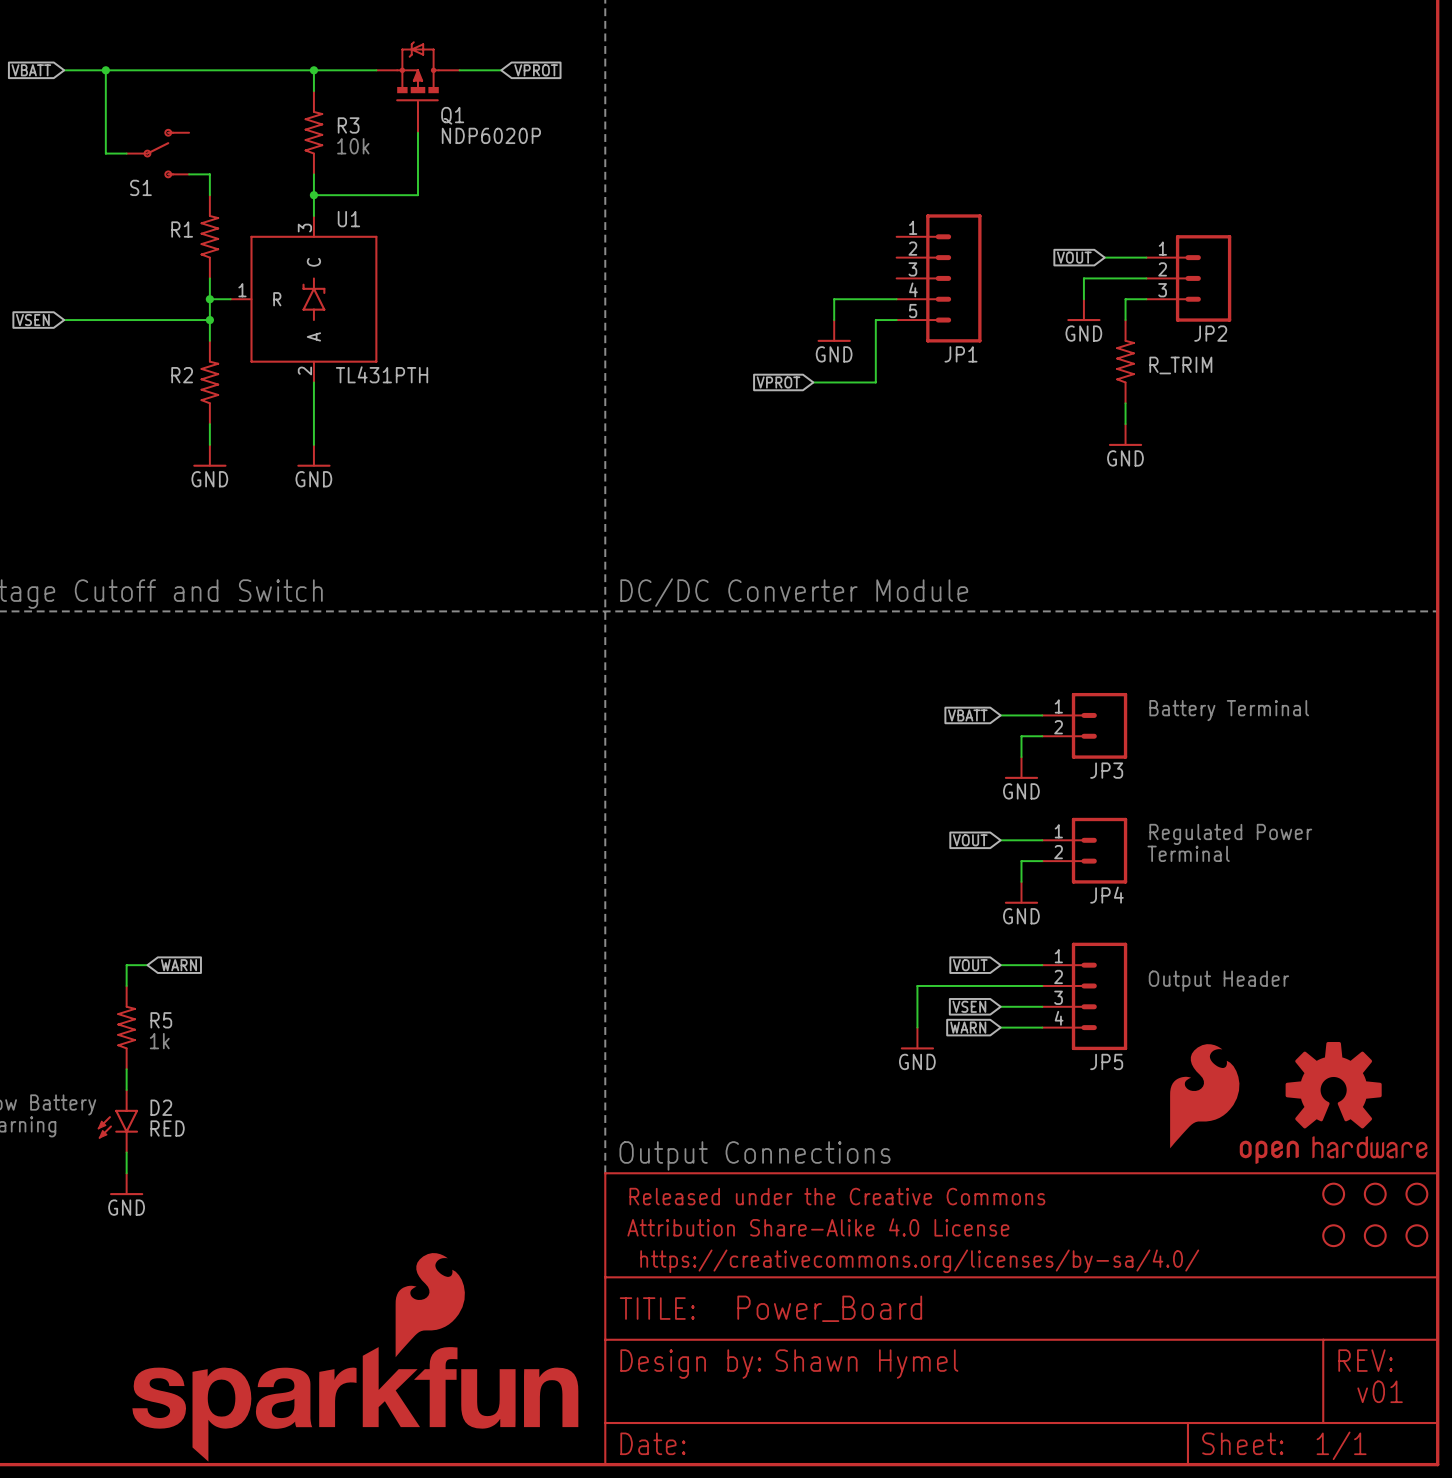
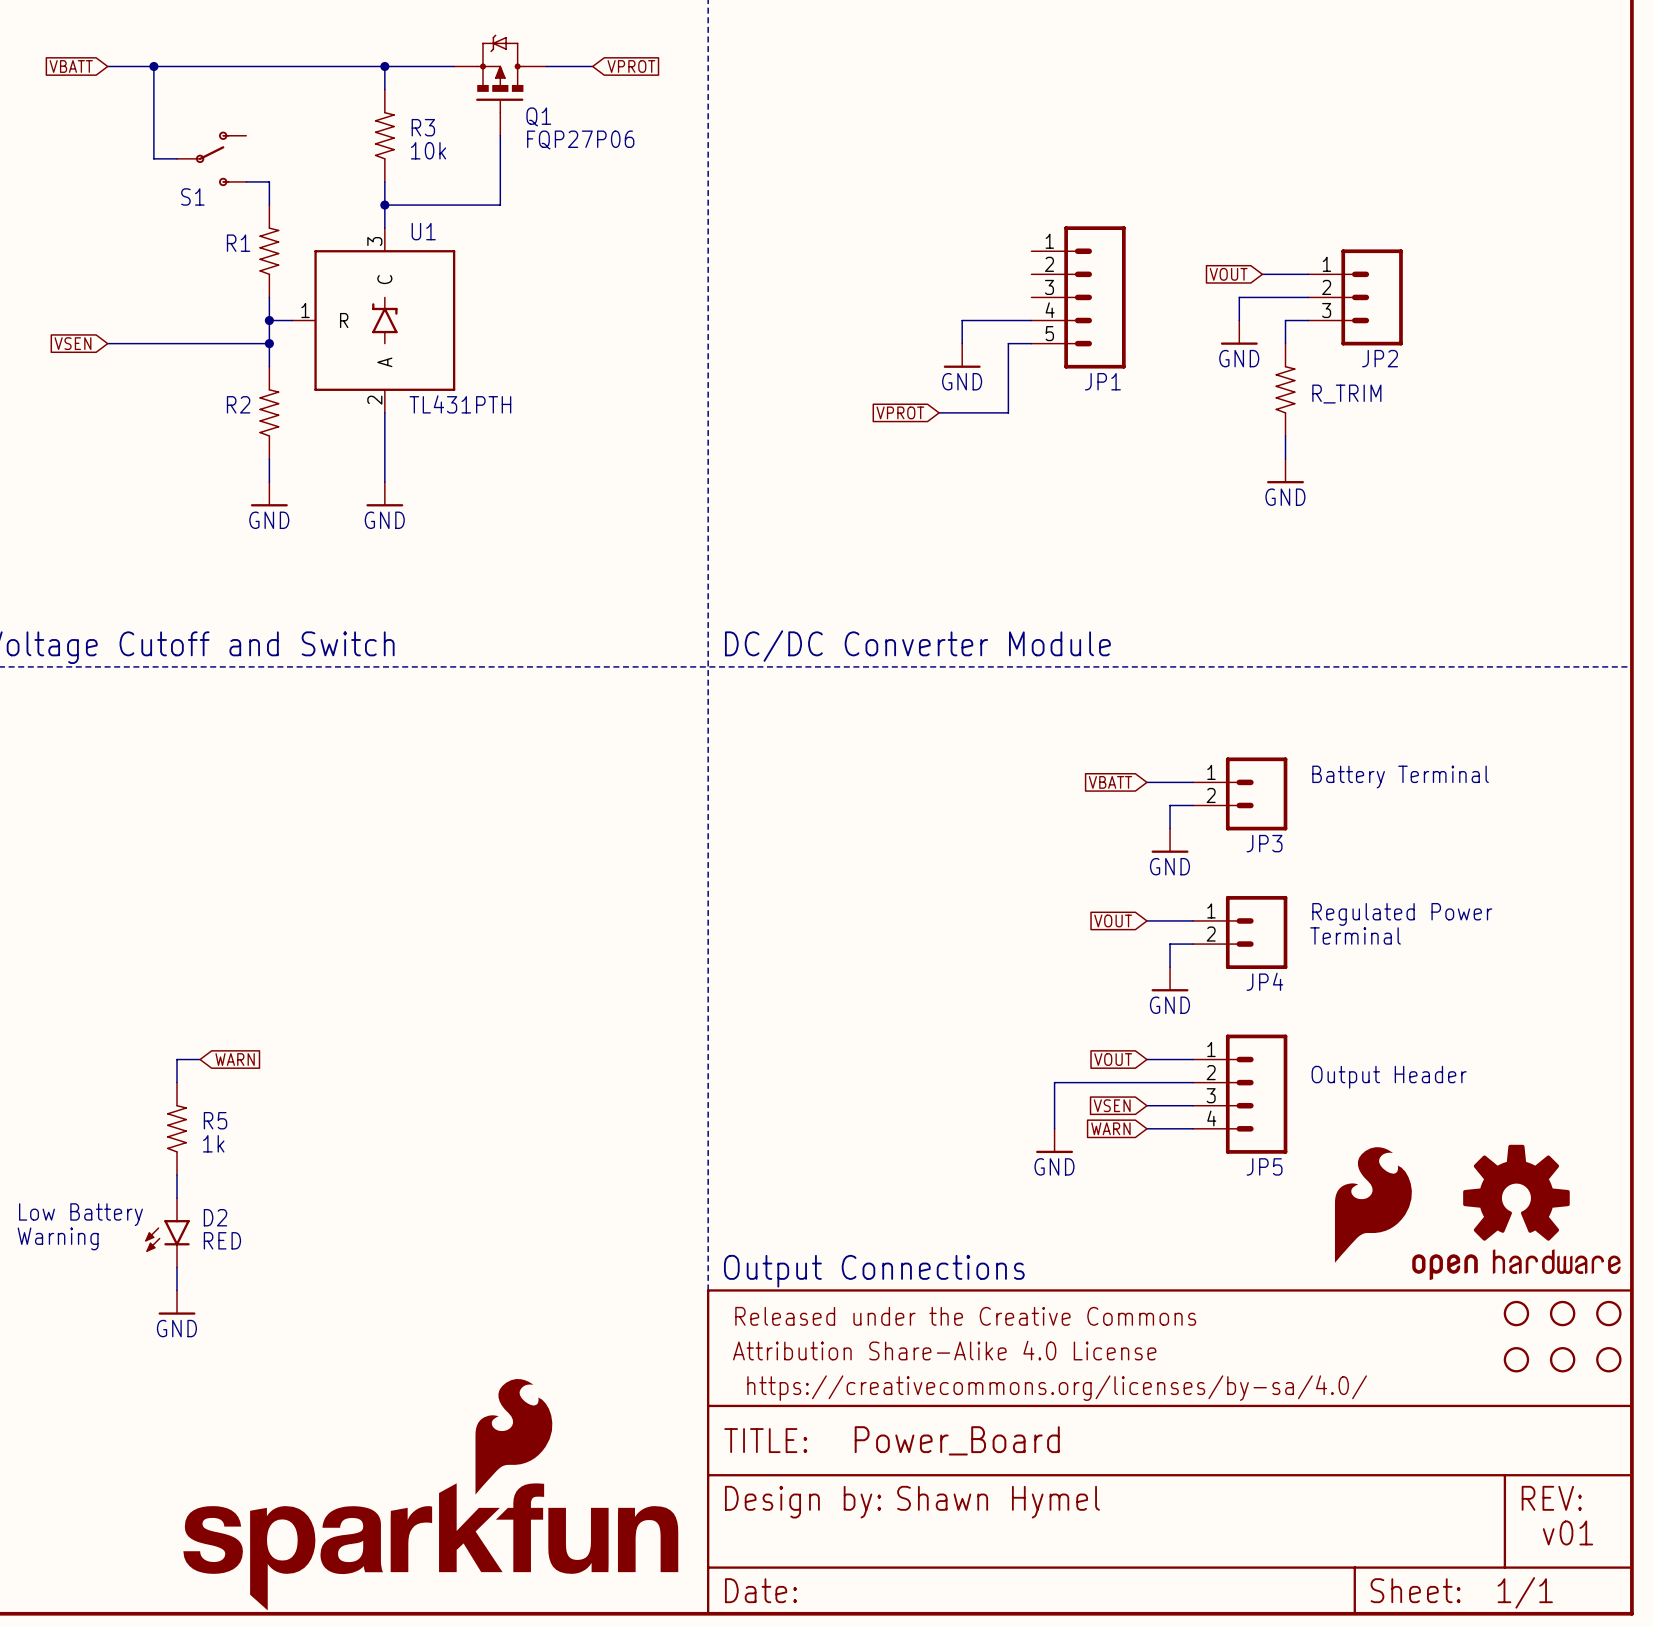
Q1 text: NDP6020P (491, 135) -> FQP27P06 (580, 140)

